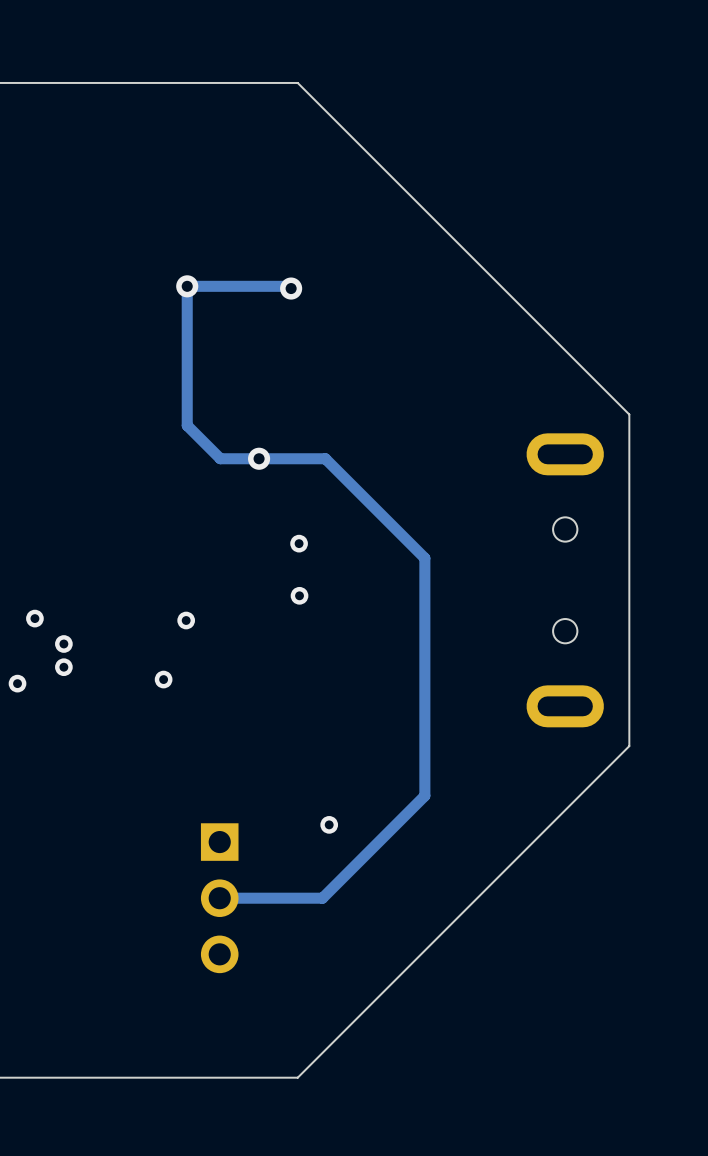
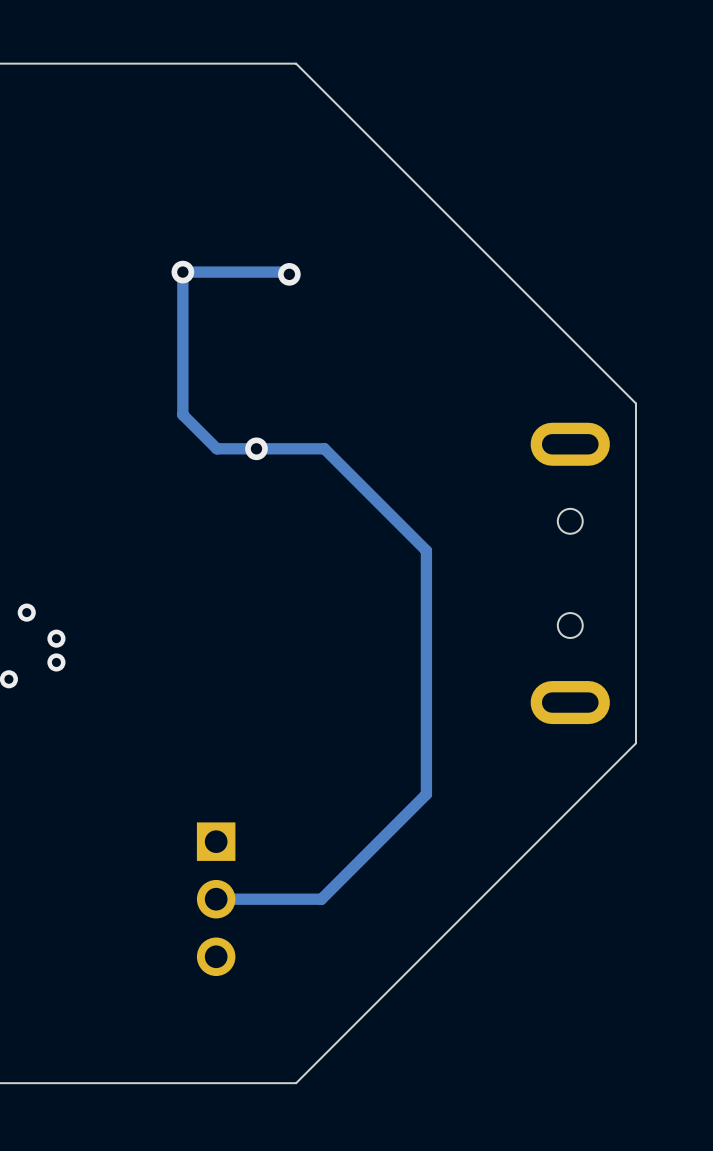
via: (299, 543) -> none
via: (299, 595) -> none
via: (186, 620) -> none
via: (163, 679) -> none
via: (329, 824) -> none

